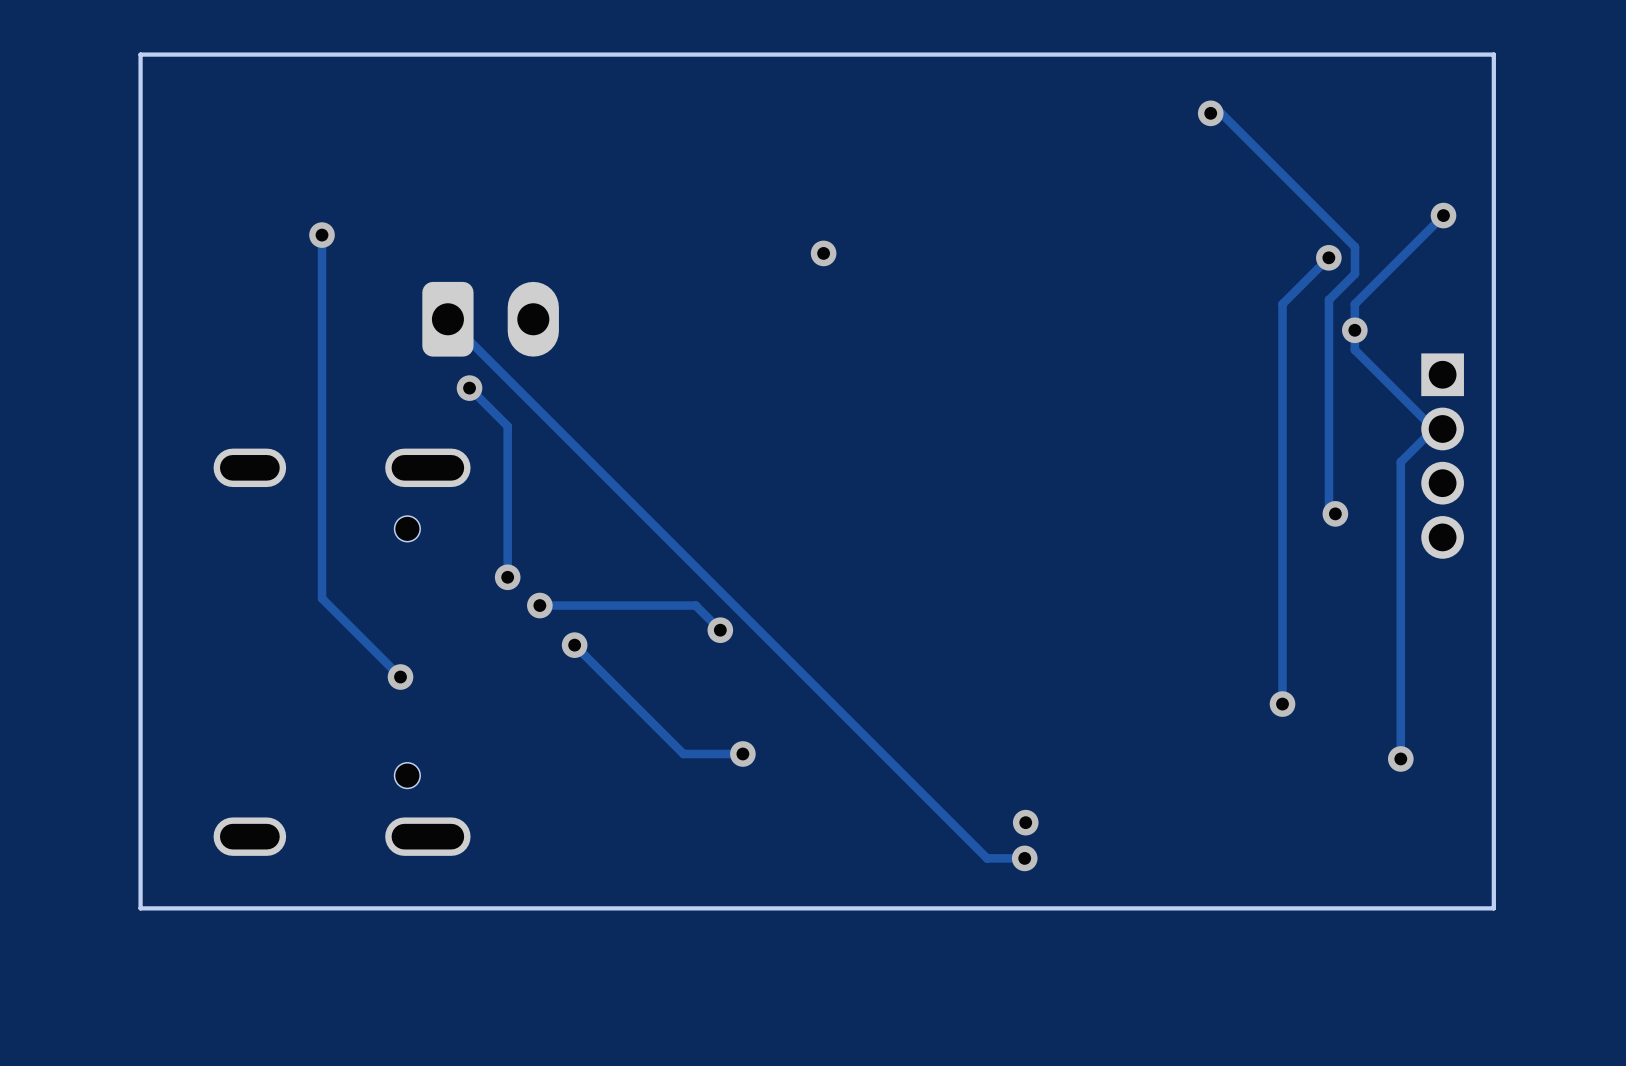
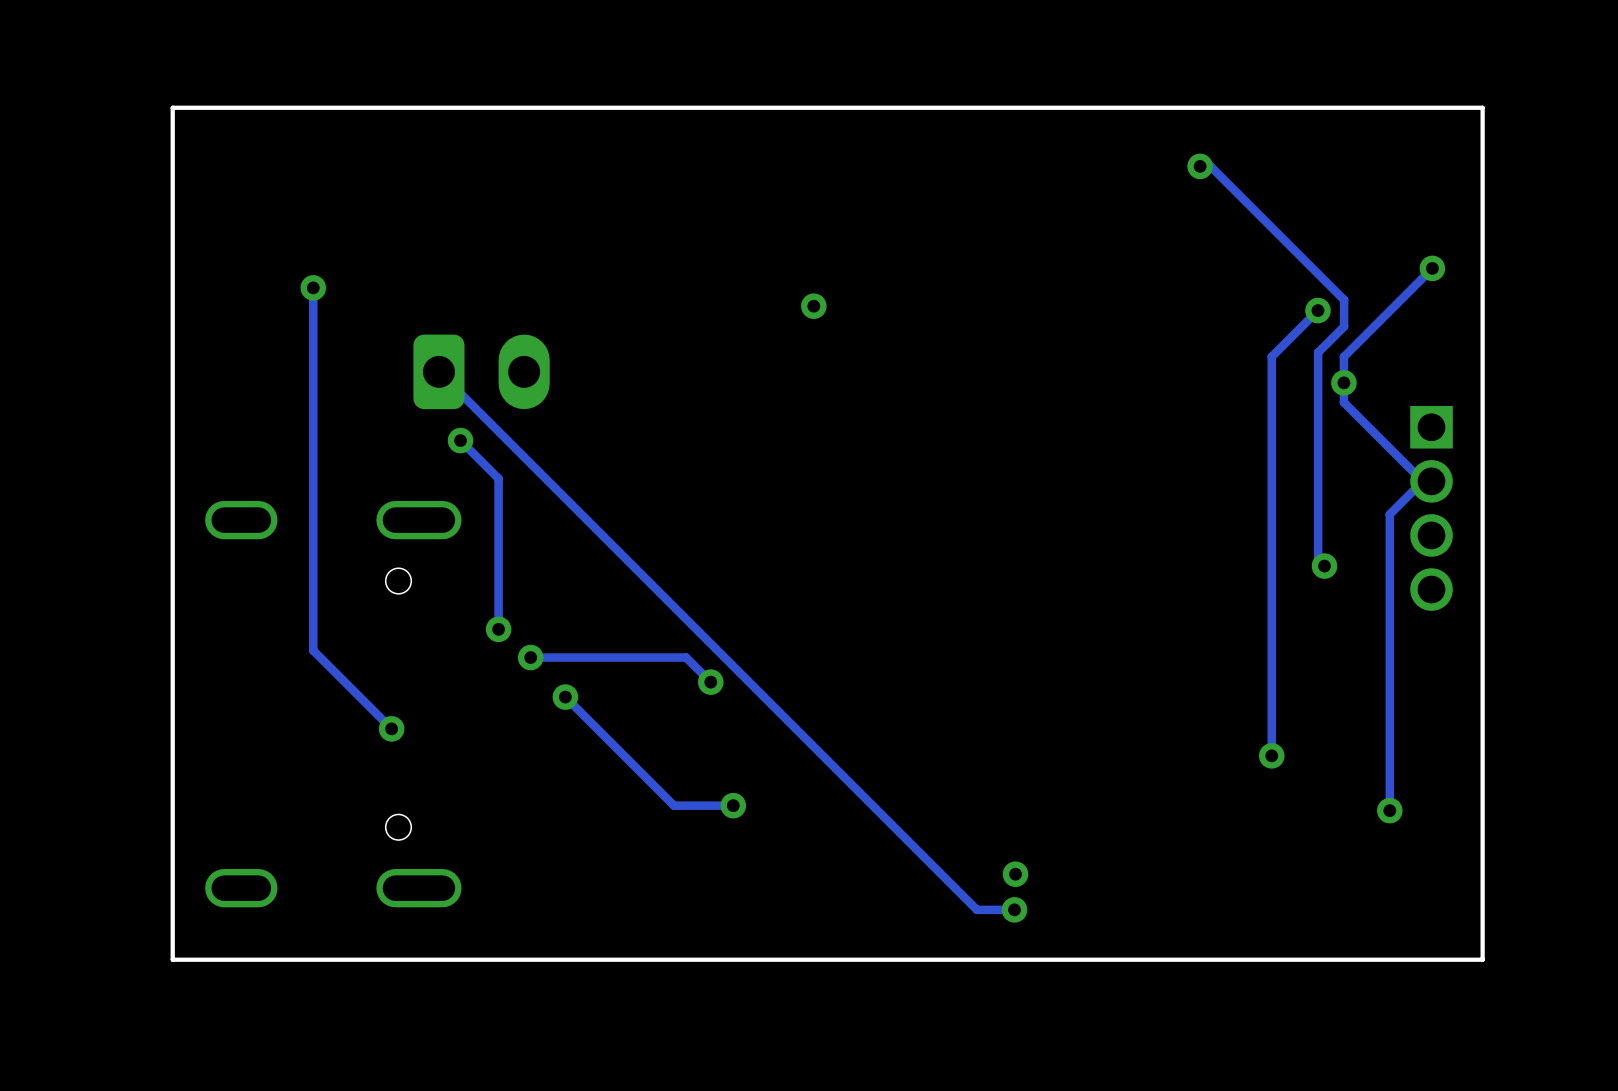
board edge: (181, 54) (140, 54) (140, 908) (181, 908) -> (172, 107) (172, 959)

